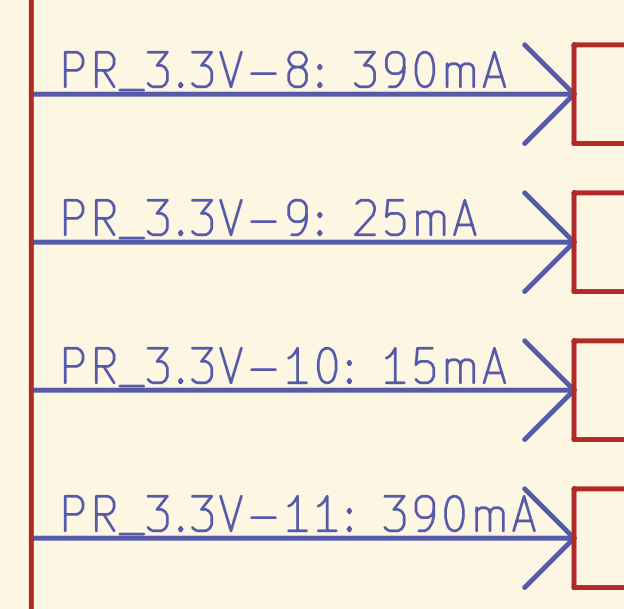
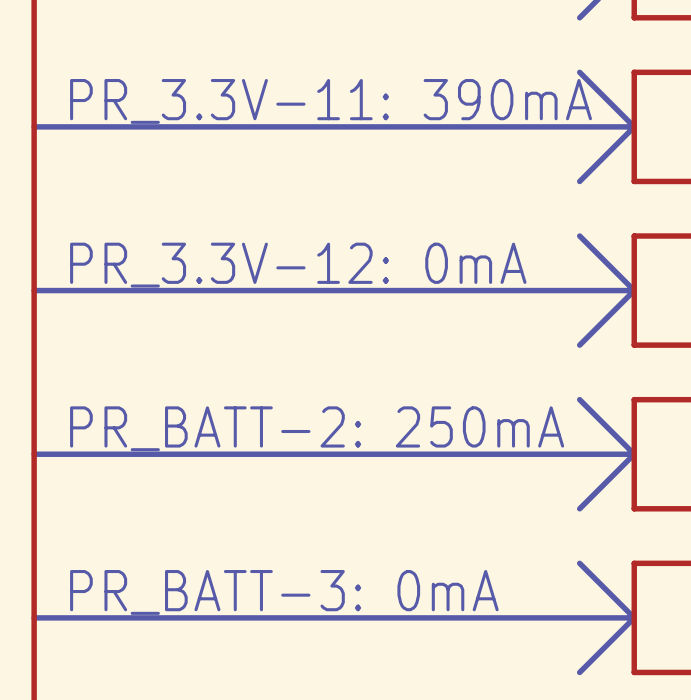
text: PR_3.3V-8: 390mA (285, 71) -> PR_3.3V-11: 390mA (331, 101)
text: PR_3.3V-9: 25mA (270, 219) -> PR_3.3V-12: 0mA (298, 265)
text: PR_3.3V-10: 15mA (285, 367) -> PR_BATT-2: 250mA (317, 428)
text: PR_3.3V-11: 390mA (299, 515) -> PR_BATT-3: 0mA (284, 592)

